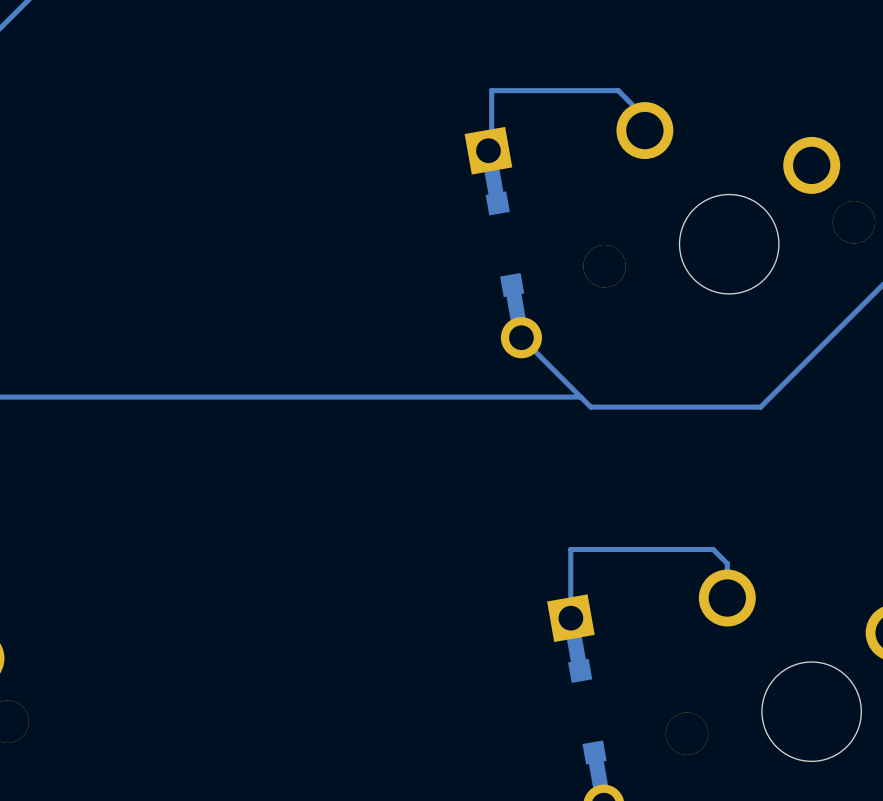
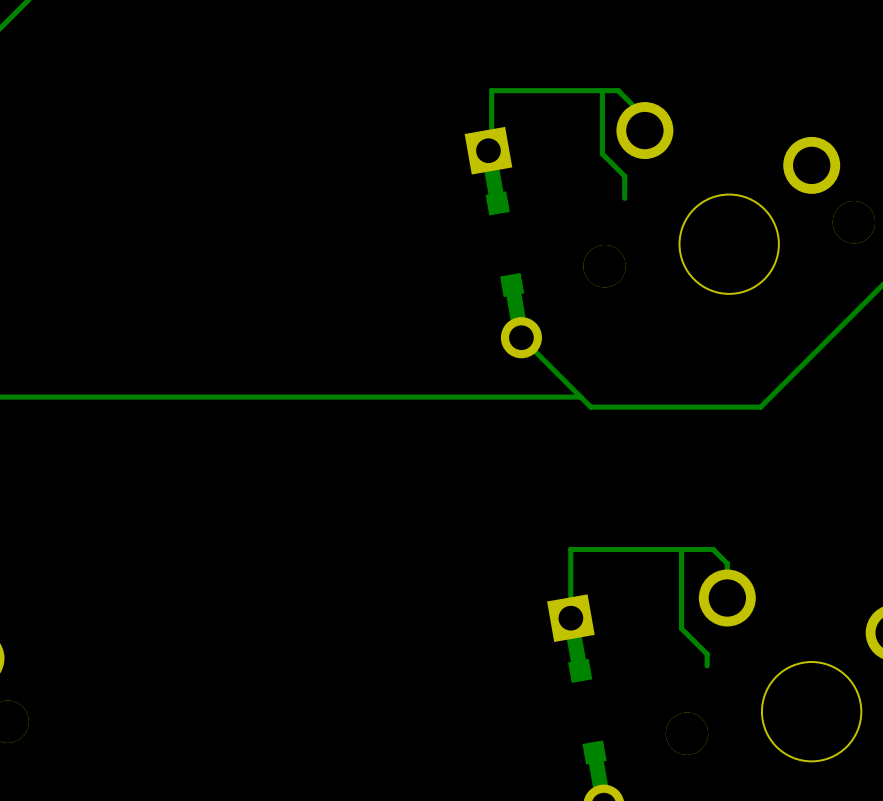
track: none -> (602, 90) (602, 153) (624, 176) (624, 198)
track: none -> (681, 549) (681, 628) (707, 654) (707, 665)

